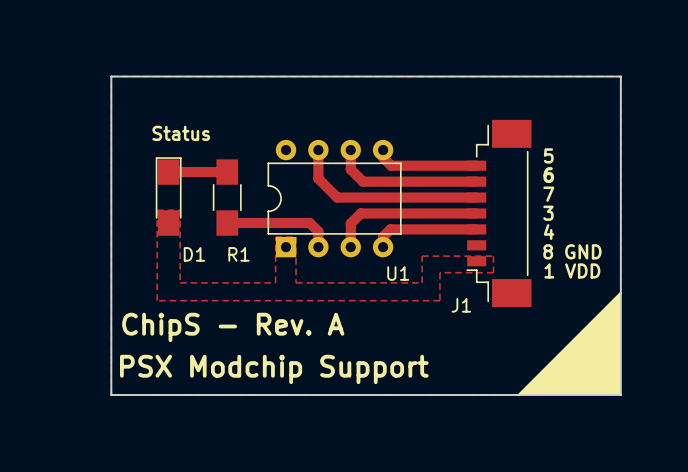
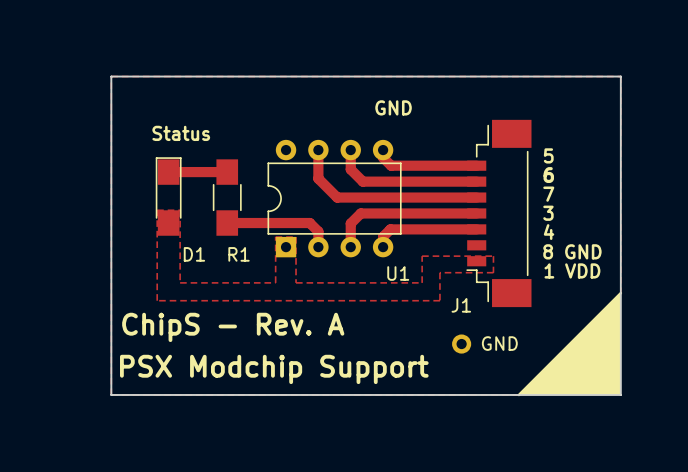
text: none -> GND (393, 107)
GND: none -> (461, 344)

